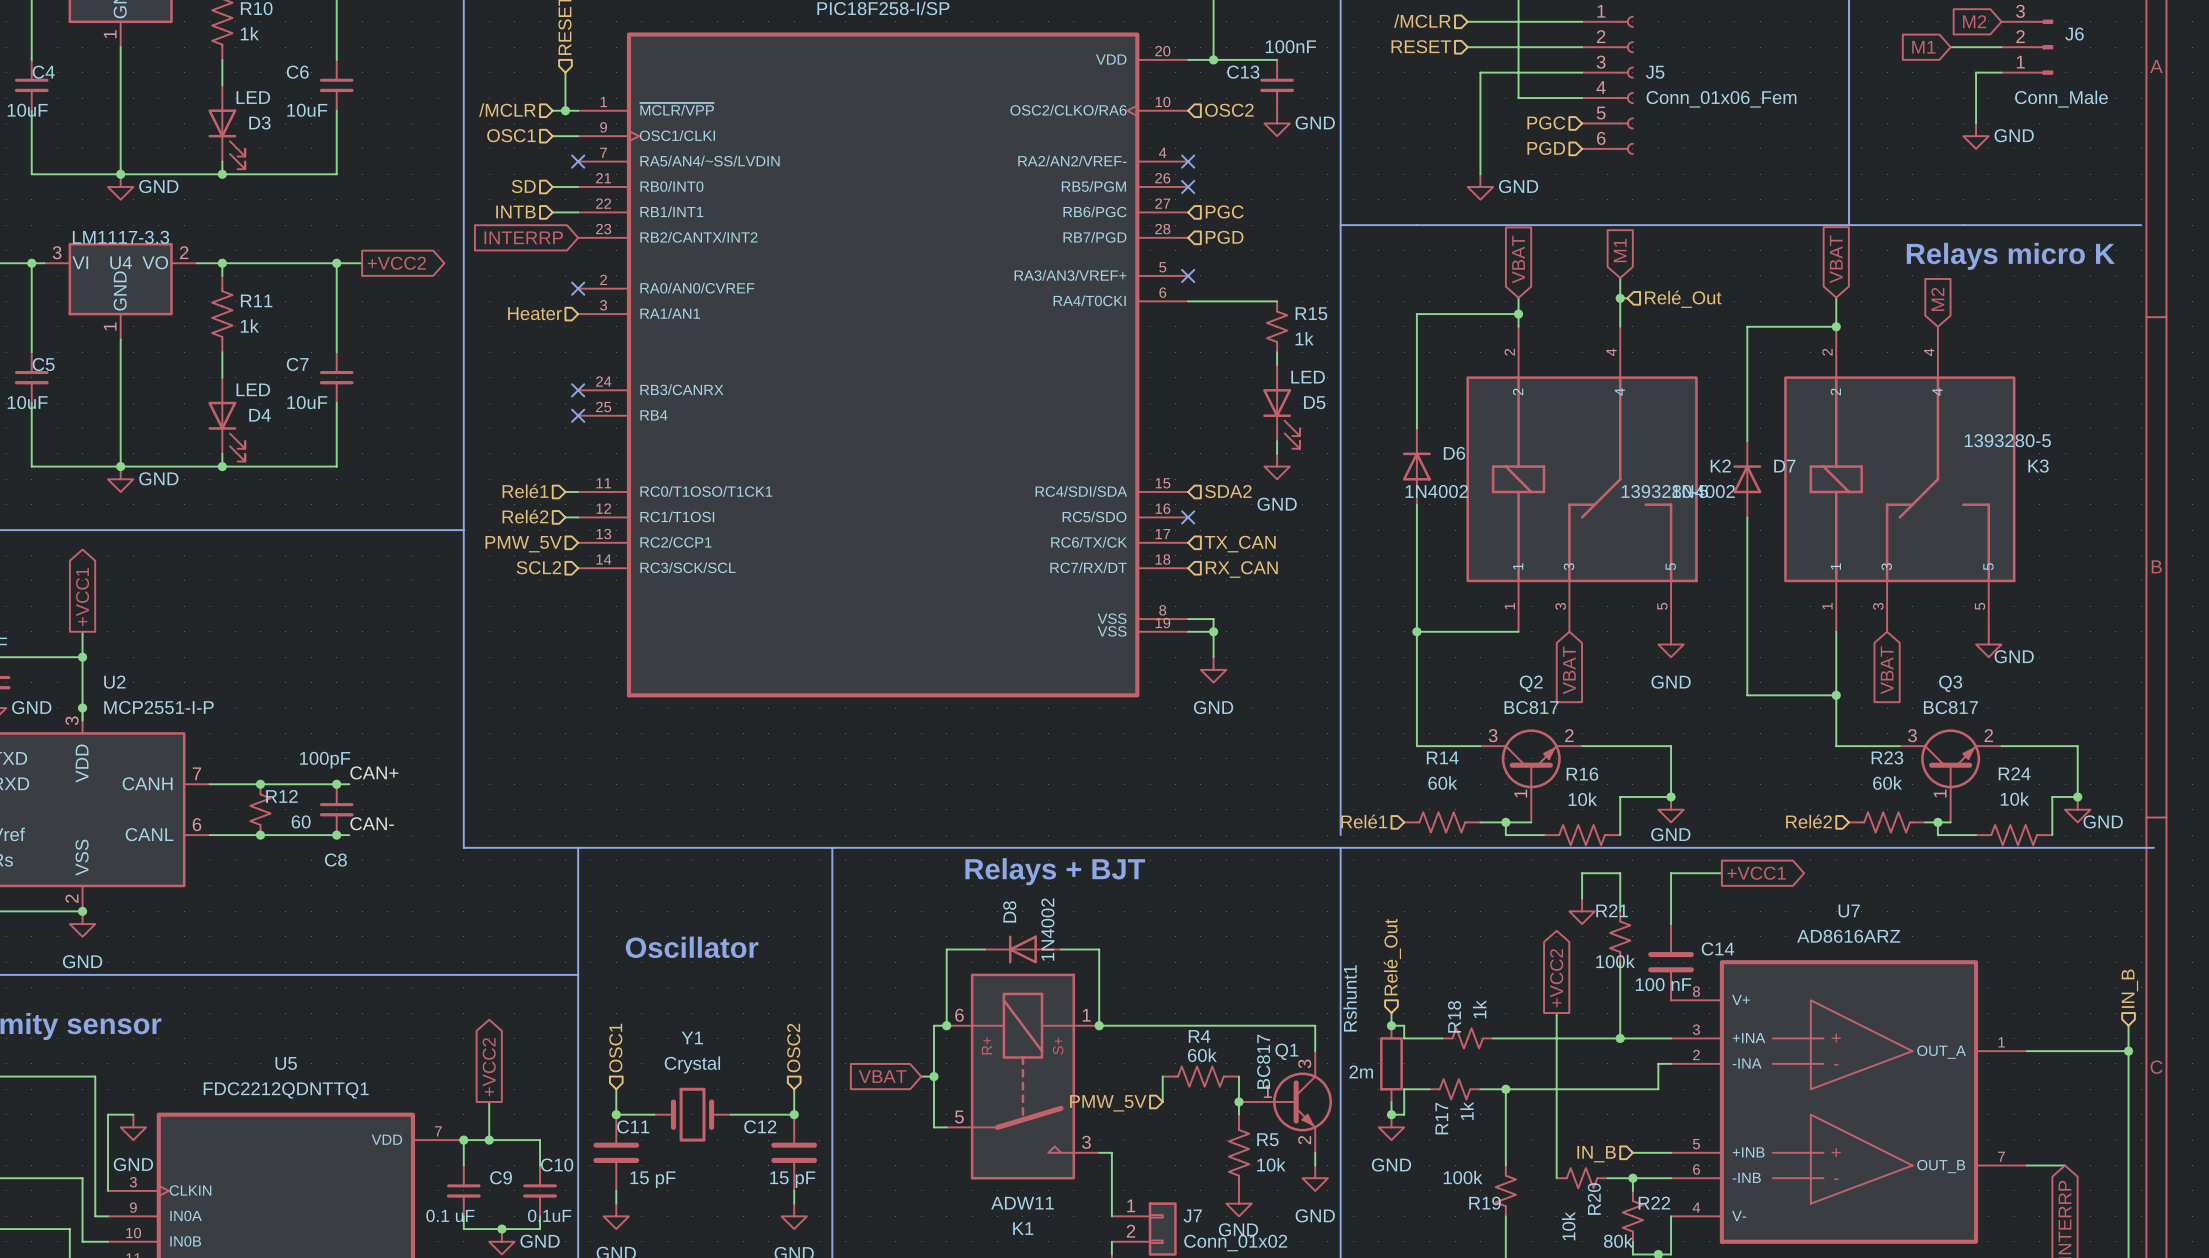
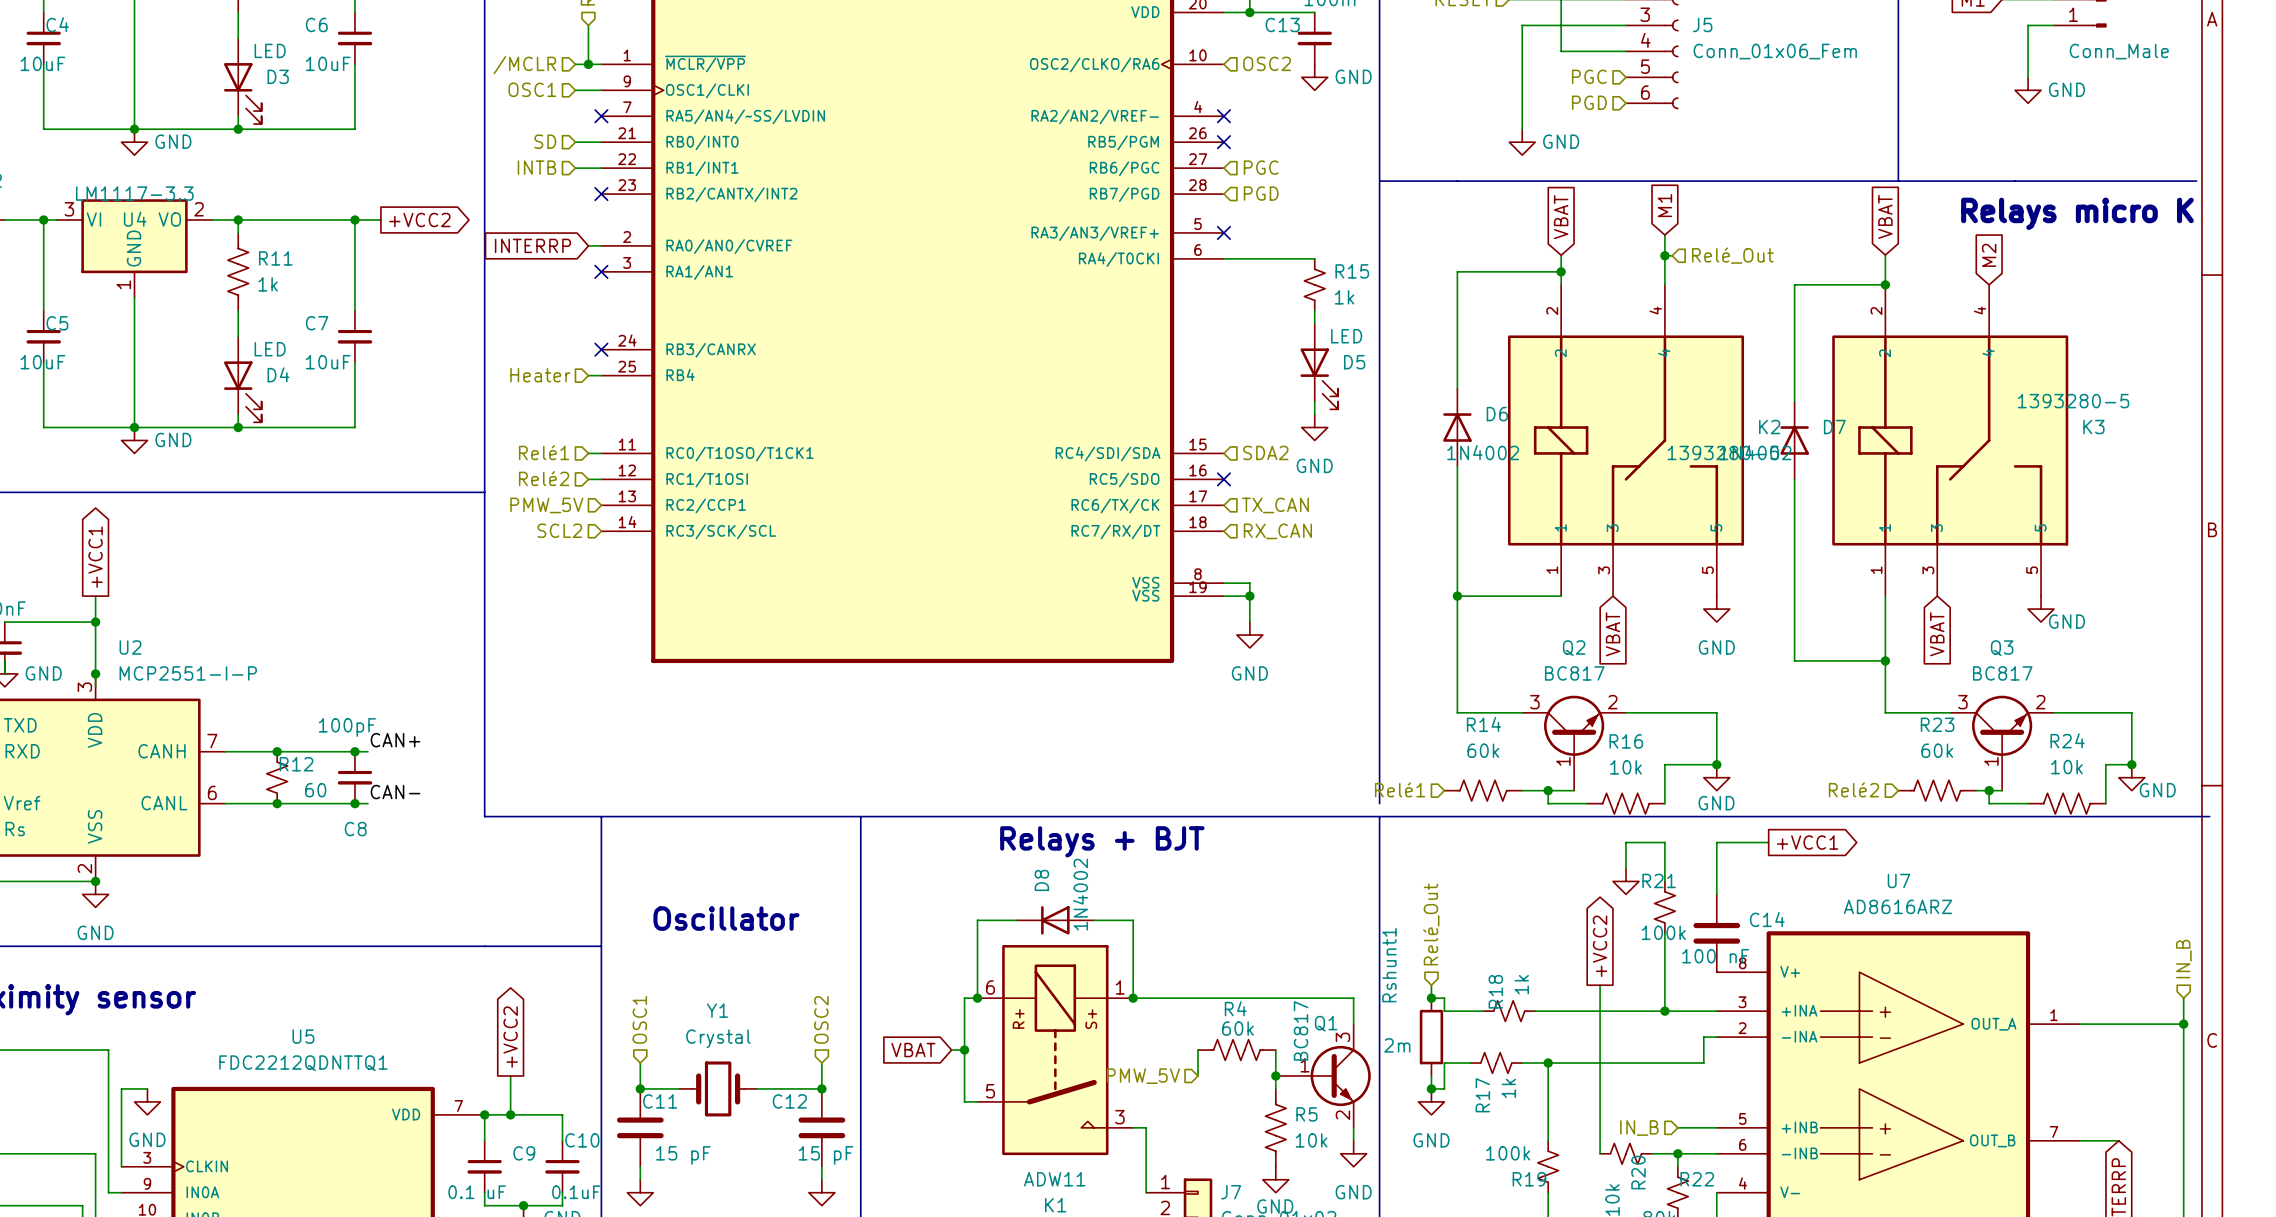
global label position: INTERRP (523, 237) -> INTERRP (532, 245)
no-connect mark: none -> (601, 194)
wire: none -> (588, 245) (601, 245)
no-connect mark: (578, 288) -> none
hierarchical label position: Heater (534, 313) -> Heater (540, 375)
no-connect mark: none -> (601, 271)
wire: none -> (588, 375) (601, 375)
no-connect mark: (578, 415) -> none

